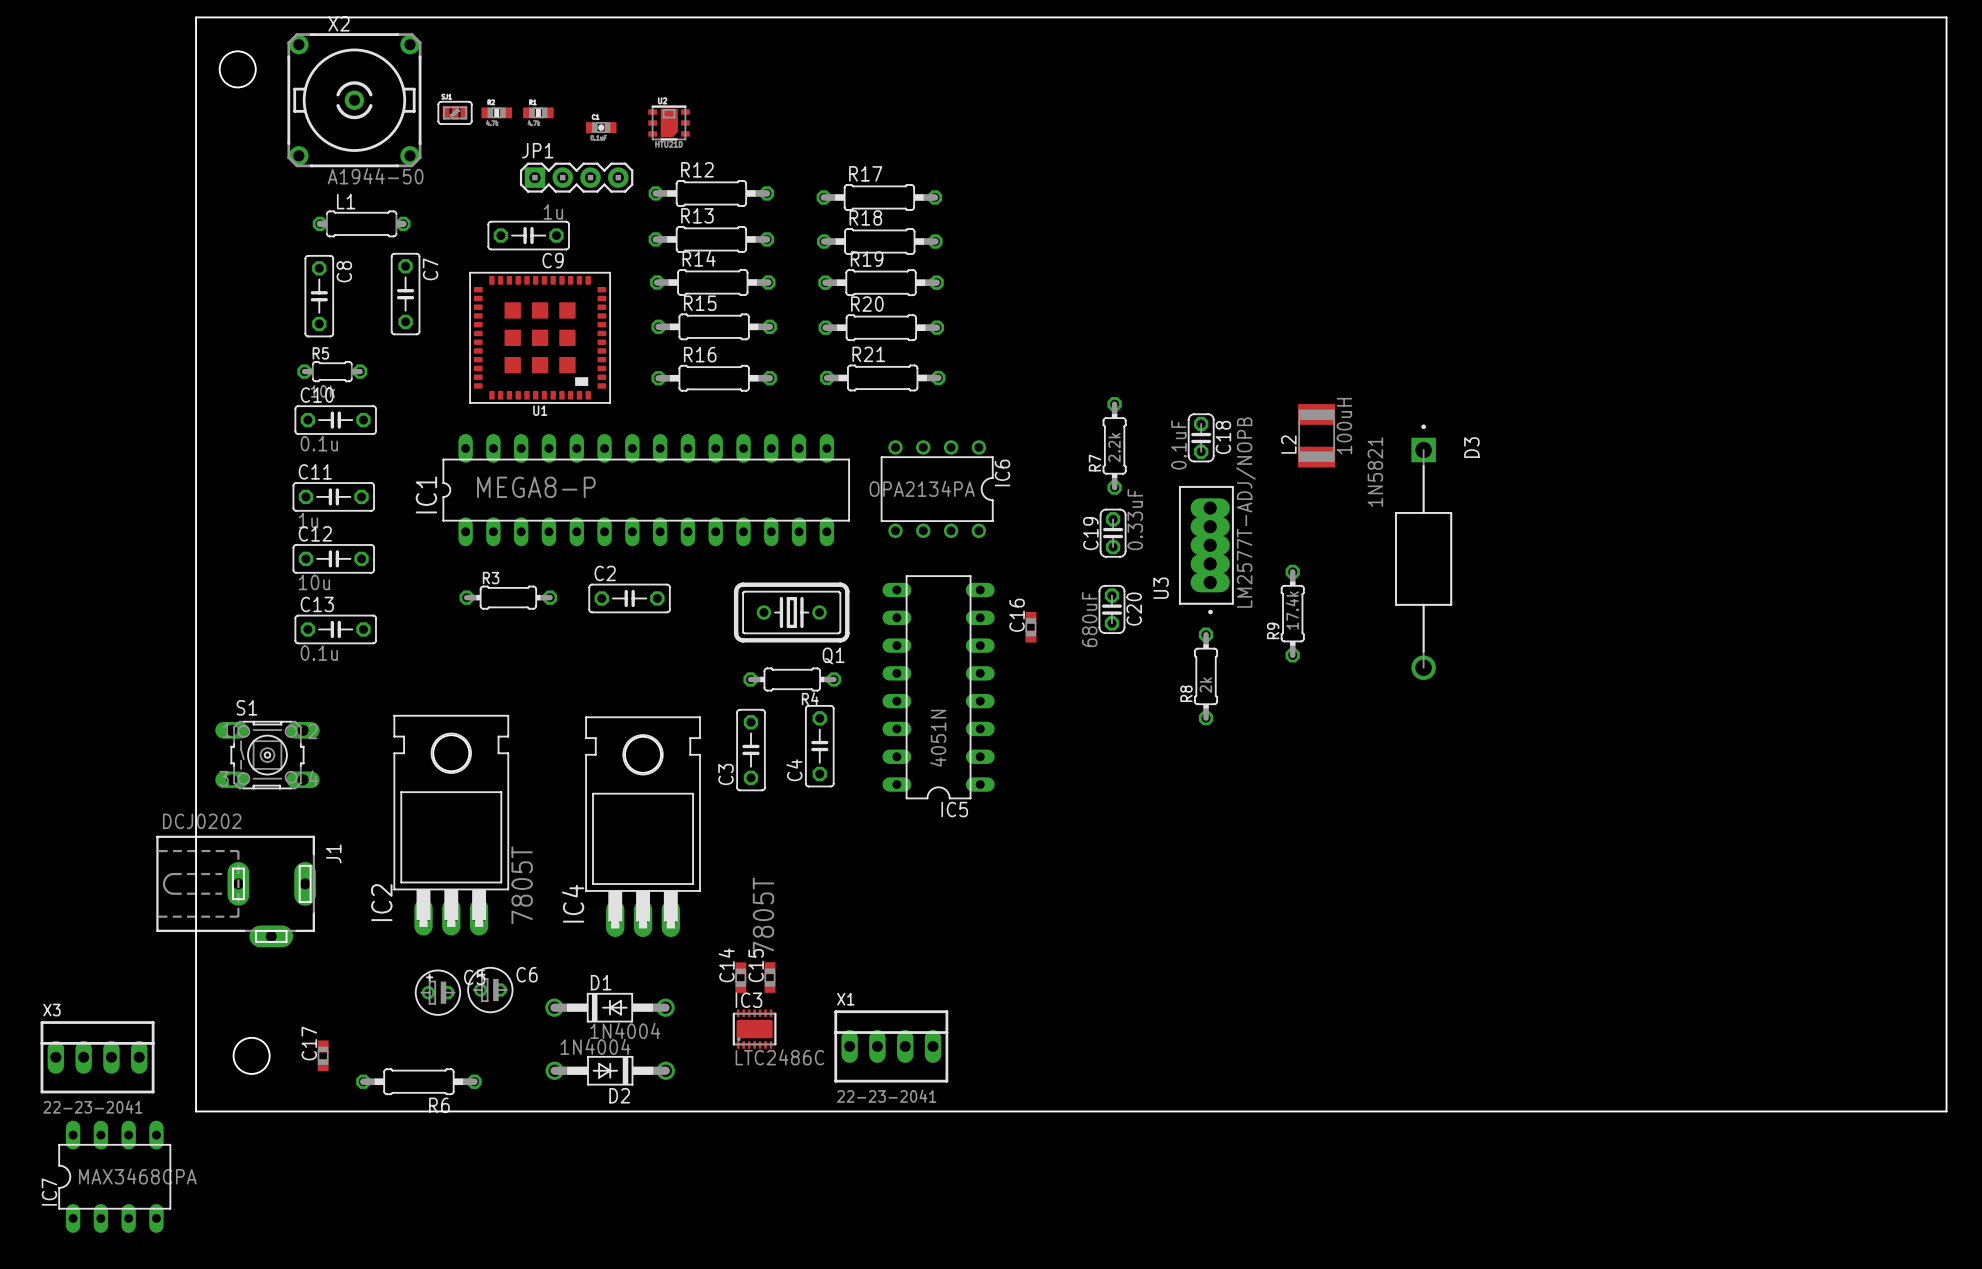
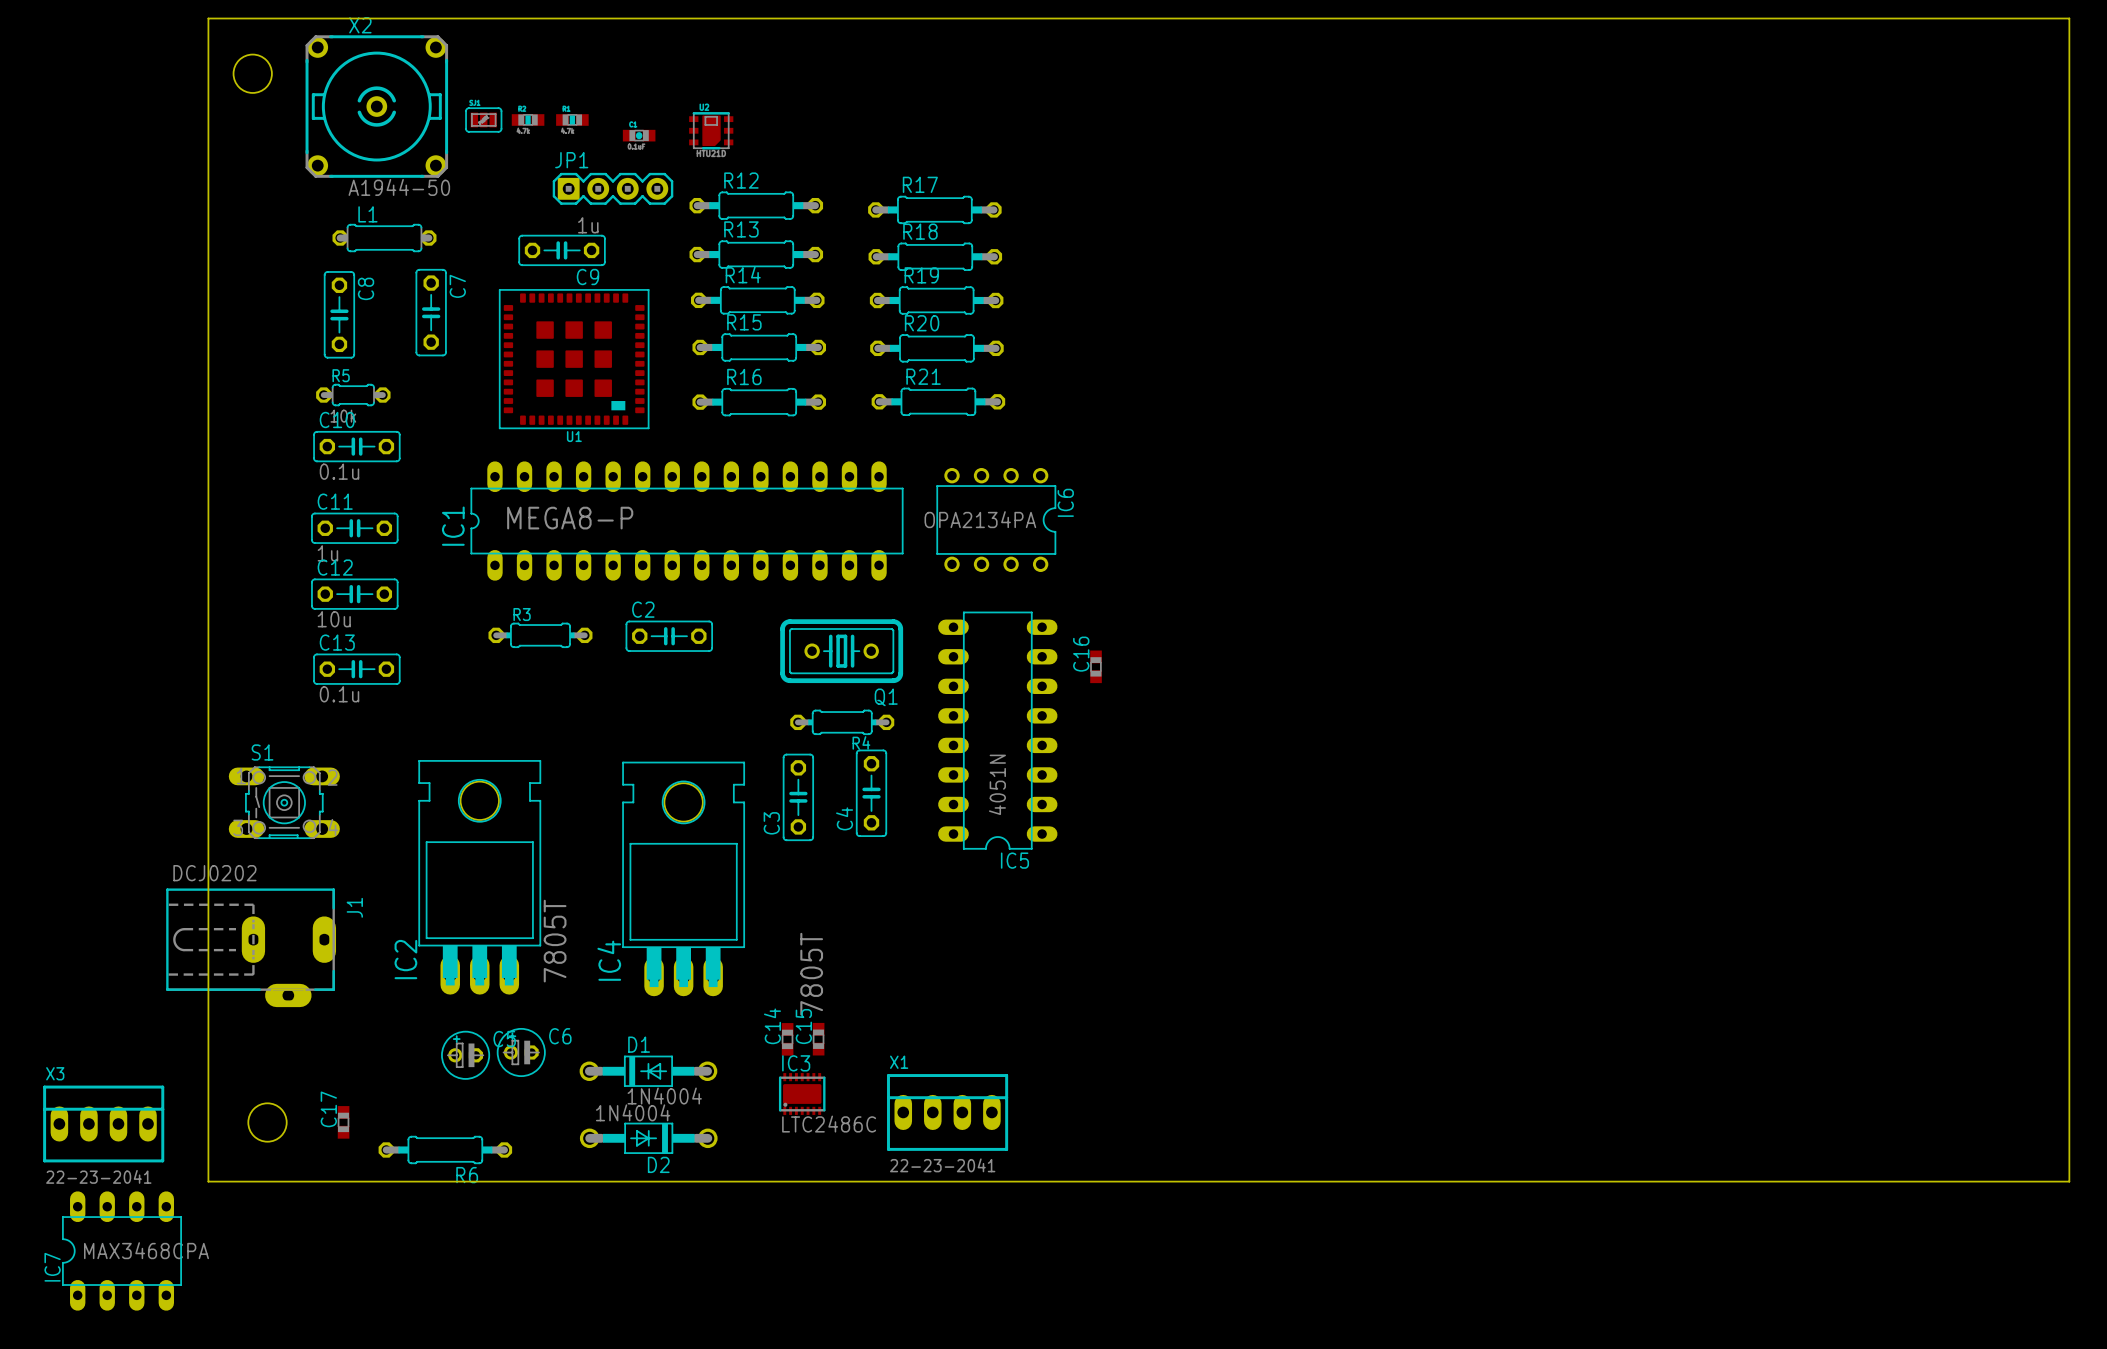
L2: 100uH (1316, 435) -> none
C18: 0.1uF (1201, 437) -> none
R7: 2.2k (1114, 445) -> none
C19: 0.33uF (1113, 533) -> none
U3: LM2577T-ADJ/NOPB (1206, 550) -> none
D3: 1N5821 (1423, 552) -> none
C20: 680uF (1111, 609) -> none
R9: 17.4k (1292, 613) -> none
R8: 2k (1206, 676) -> none

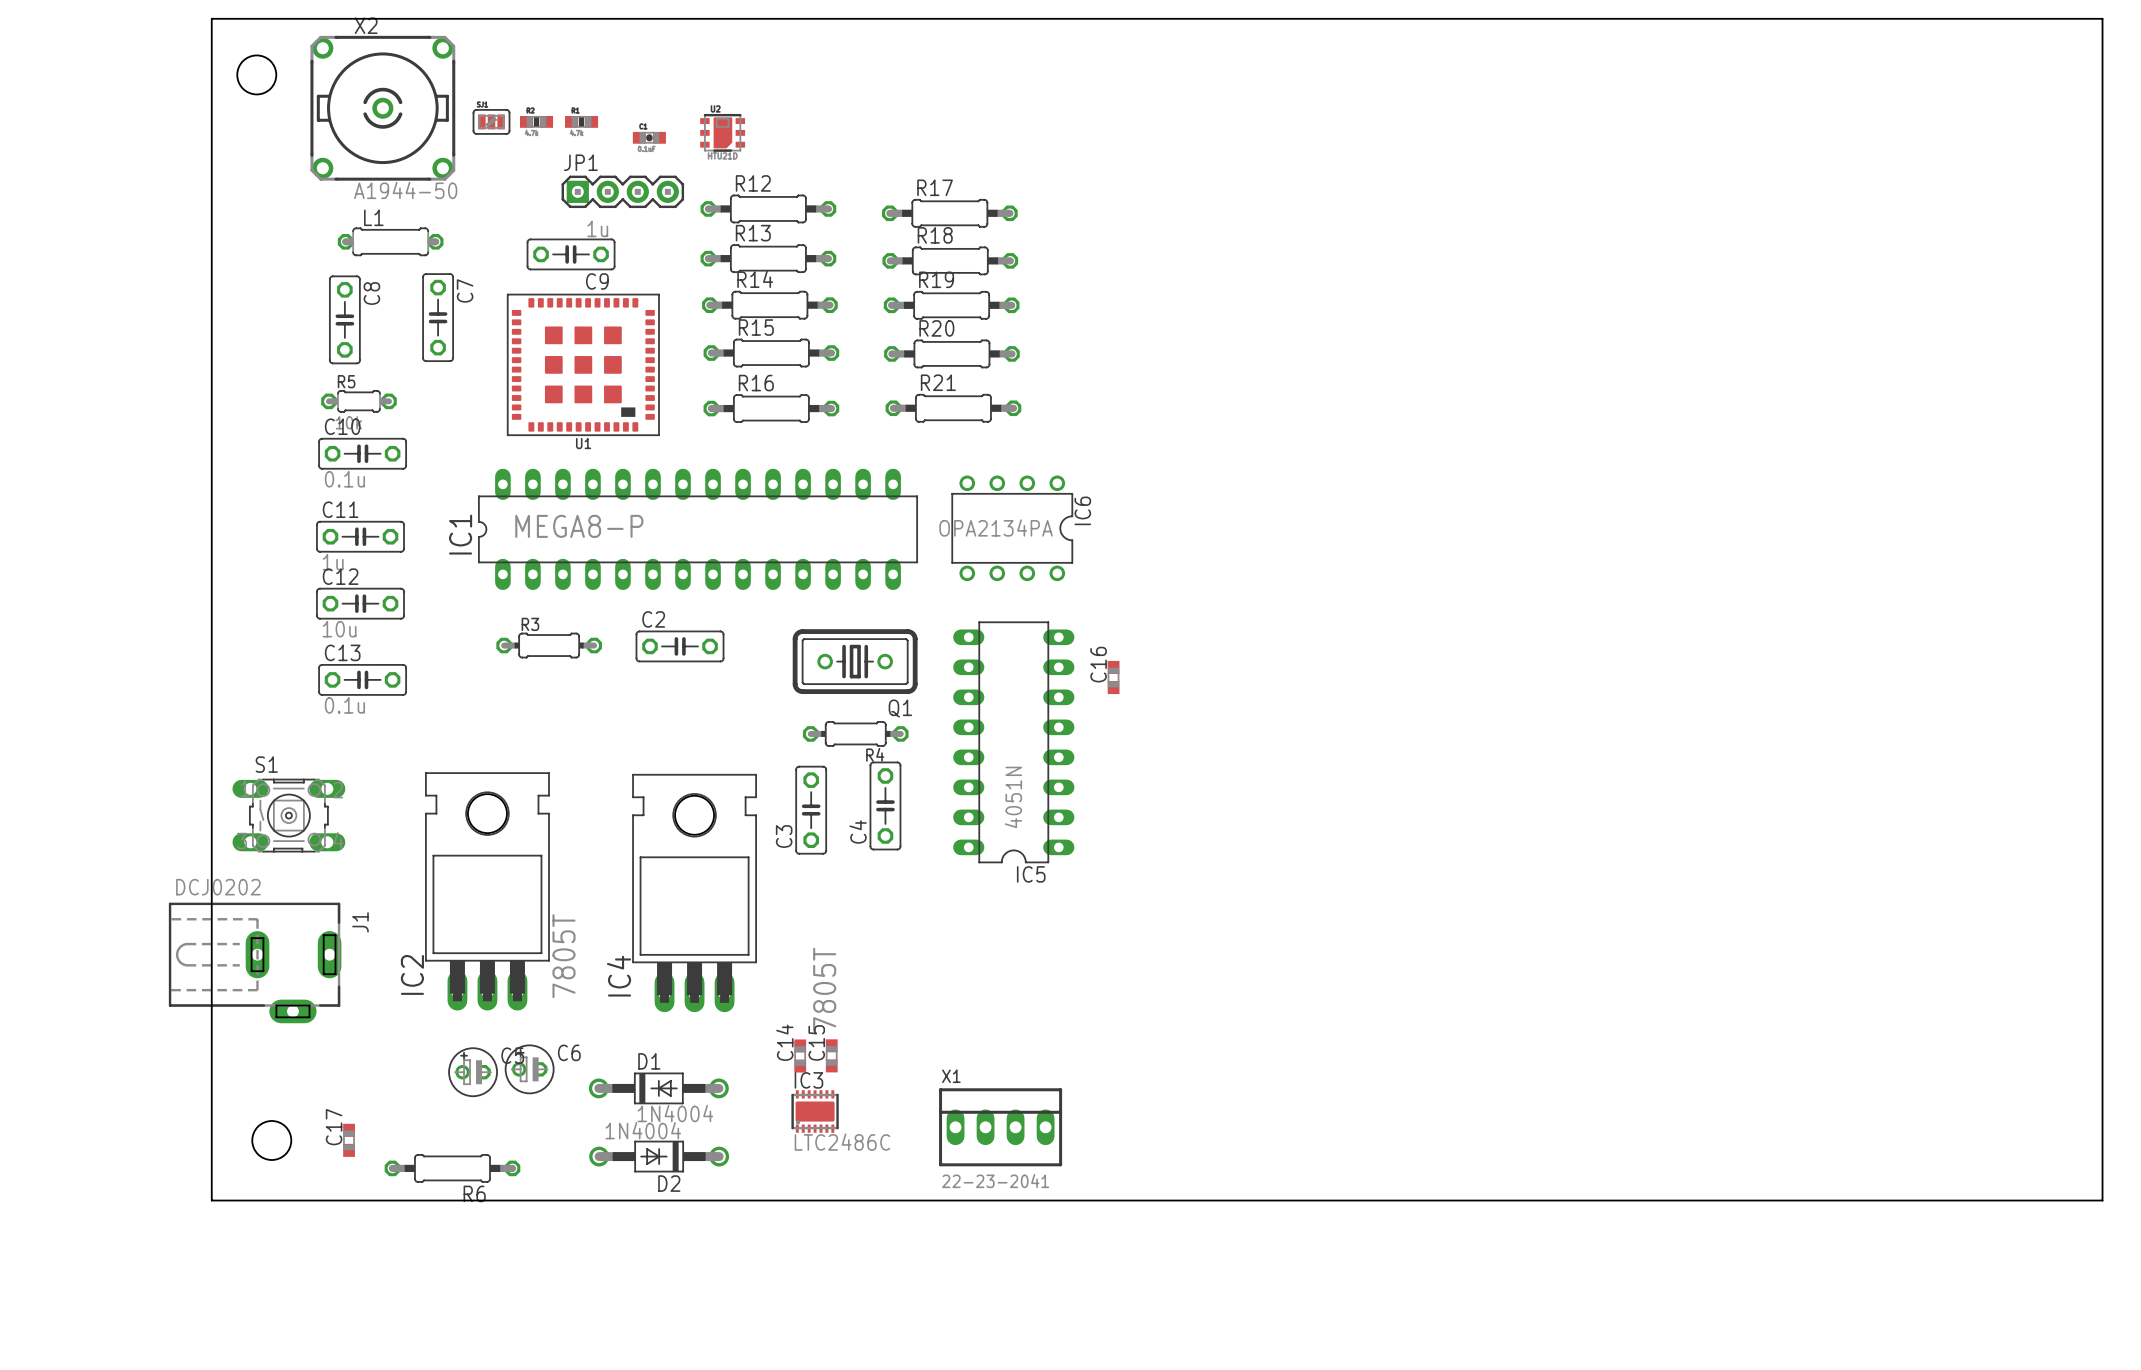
X1 position: (947, 1112) -> (1000, 1127)
X3: 22-23-2041 (103, 1123) -> none
IC7: MAX3468CPA (122, 1251) -> none

